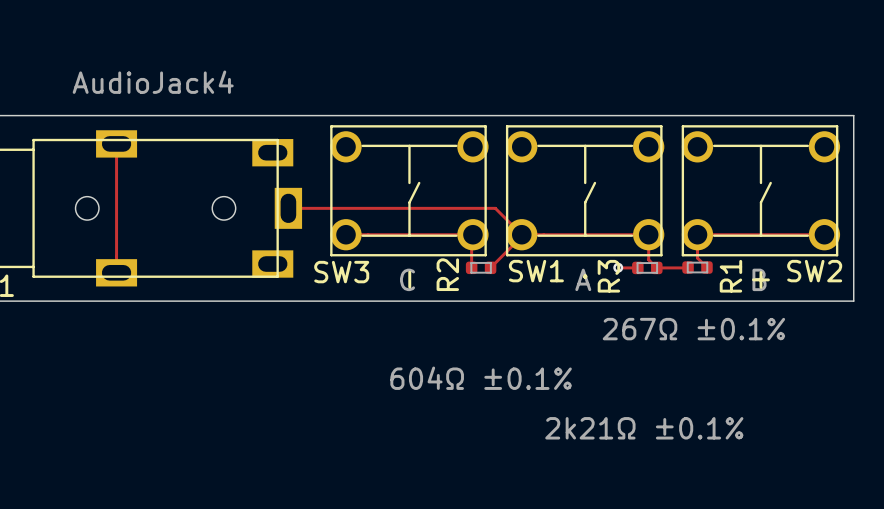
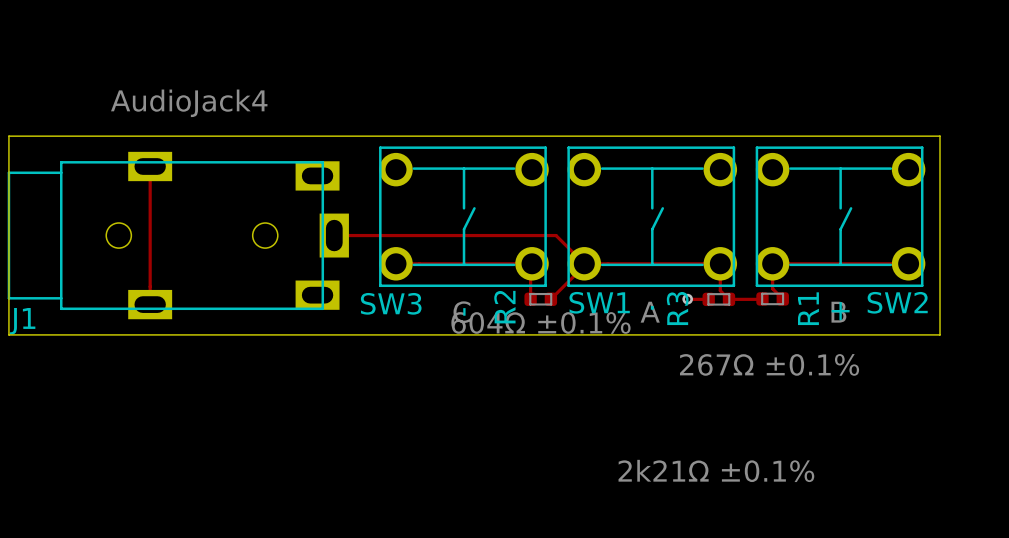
R2 value position: 604Ω ±0.1% (481, 378) -> 604Ω ±0.1% (540, 322)

